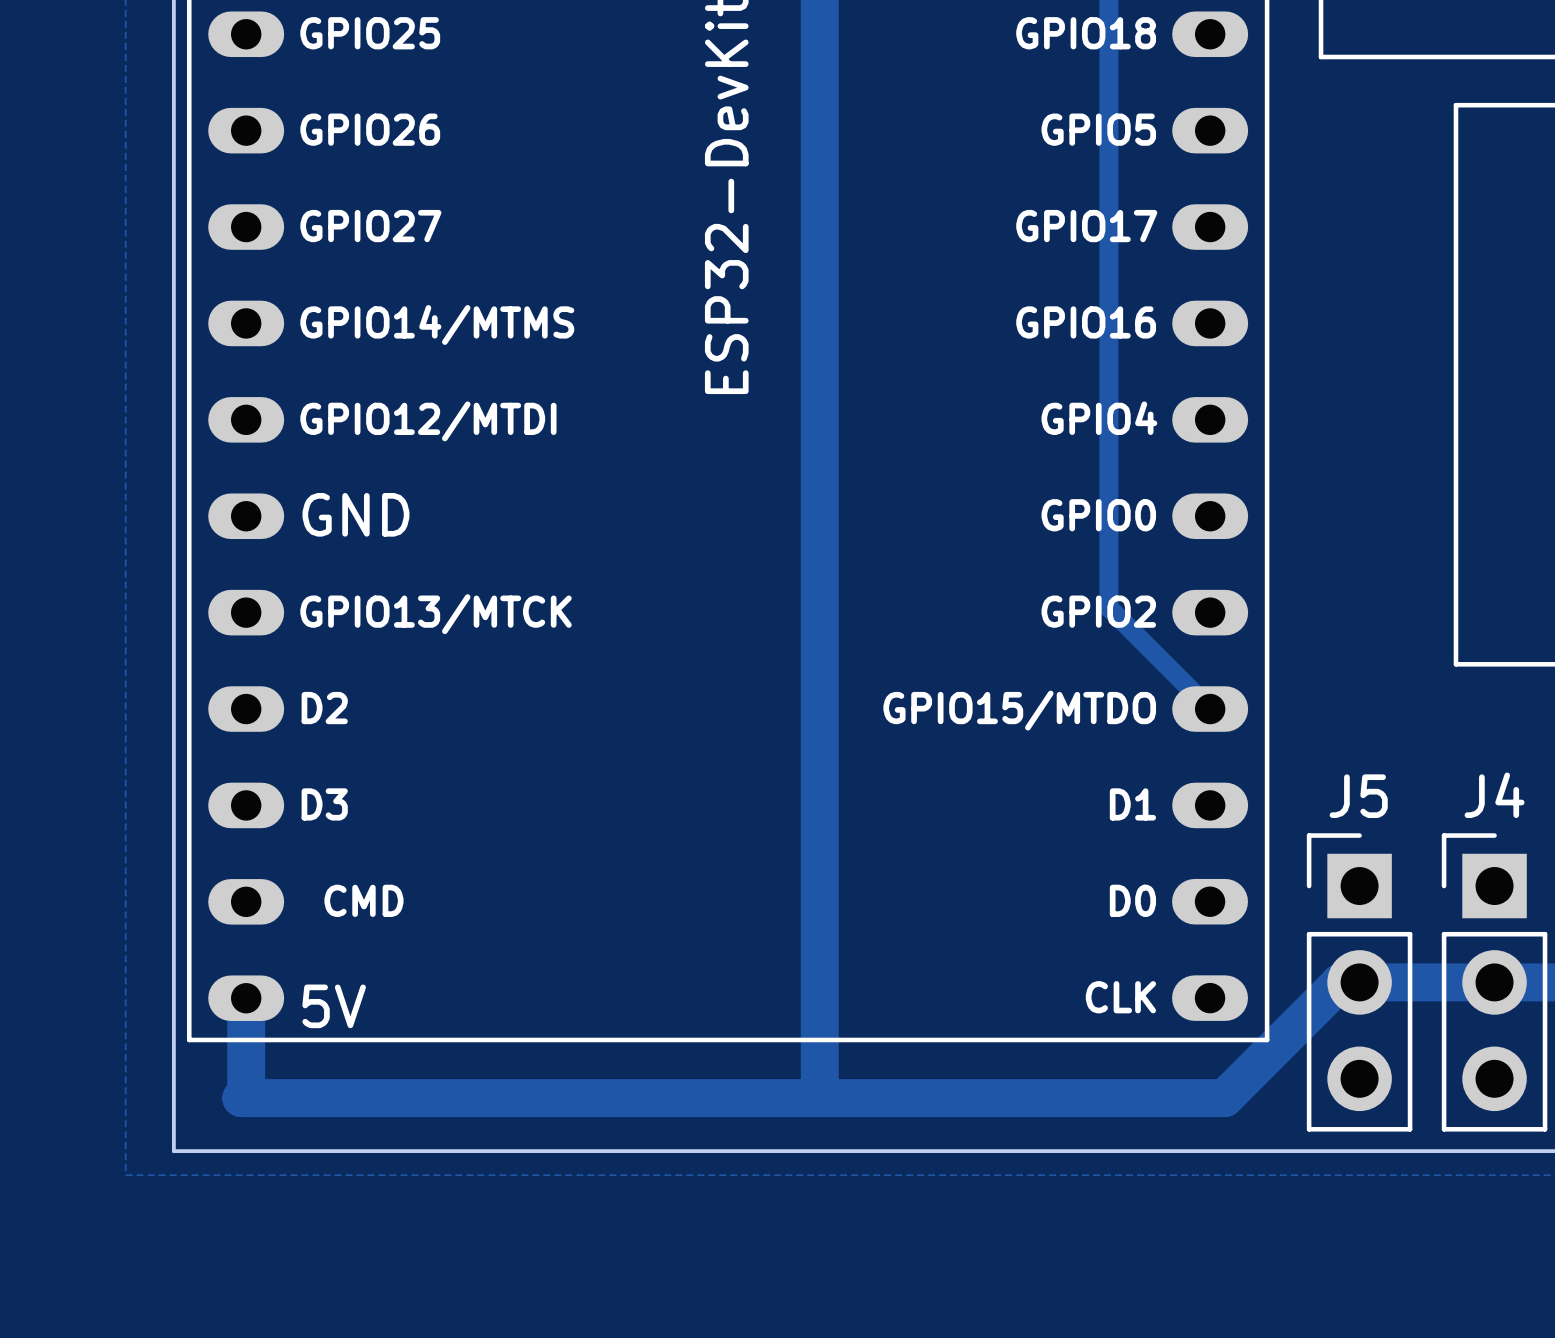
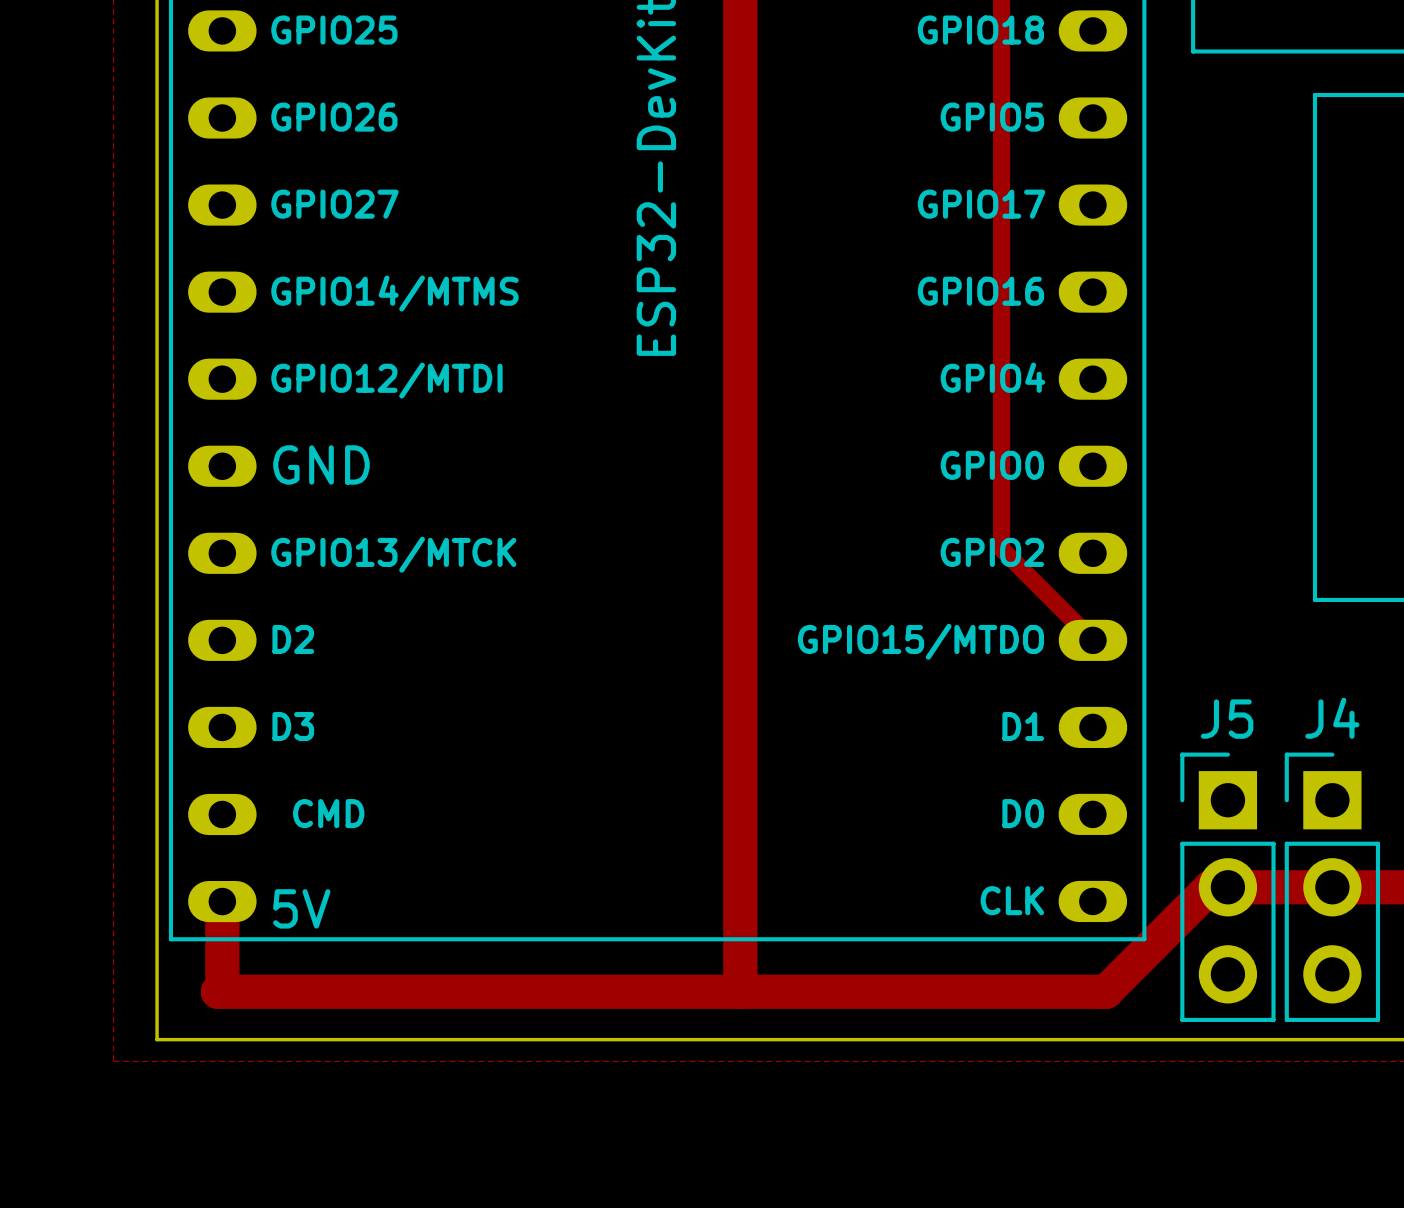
J4 position: (1494, 982) -> (1332, 887)

